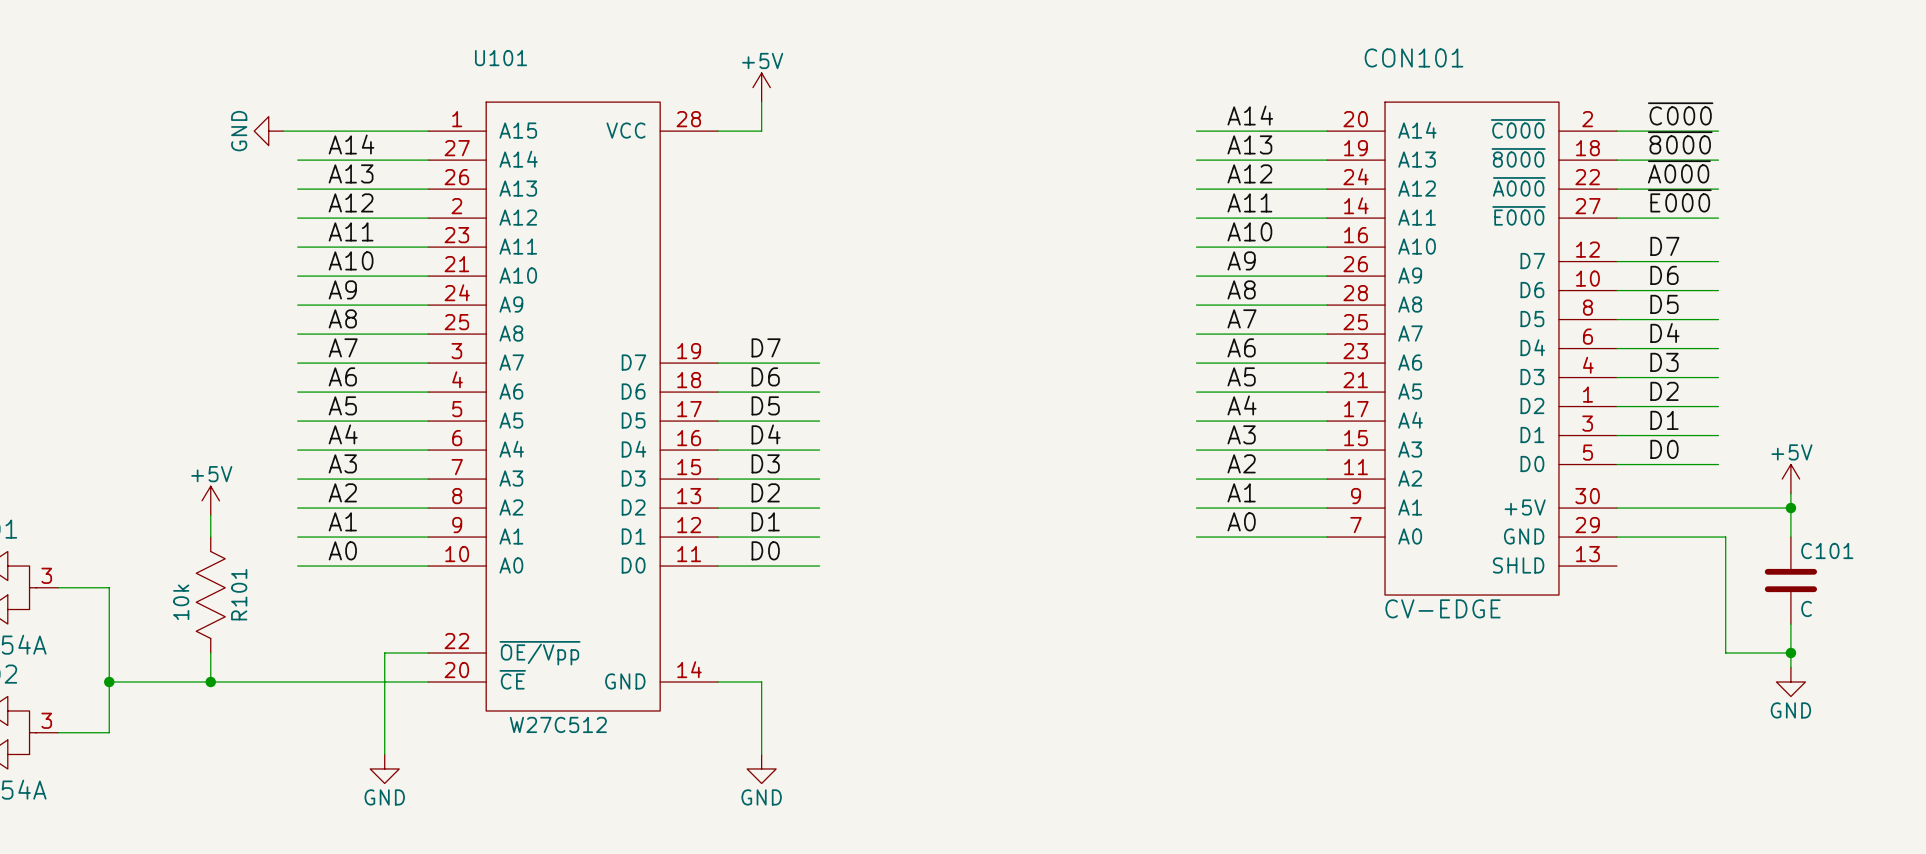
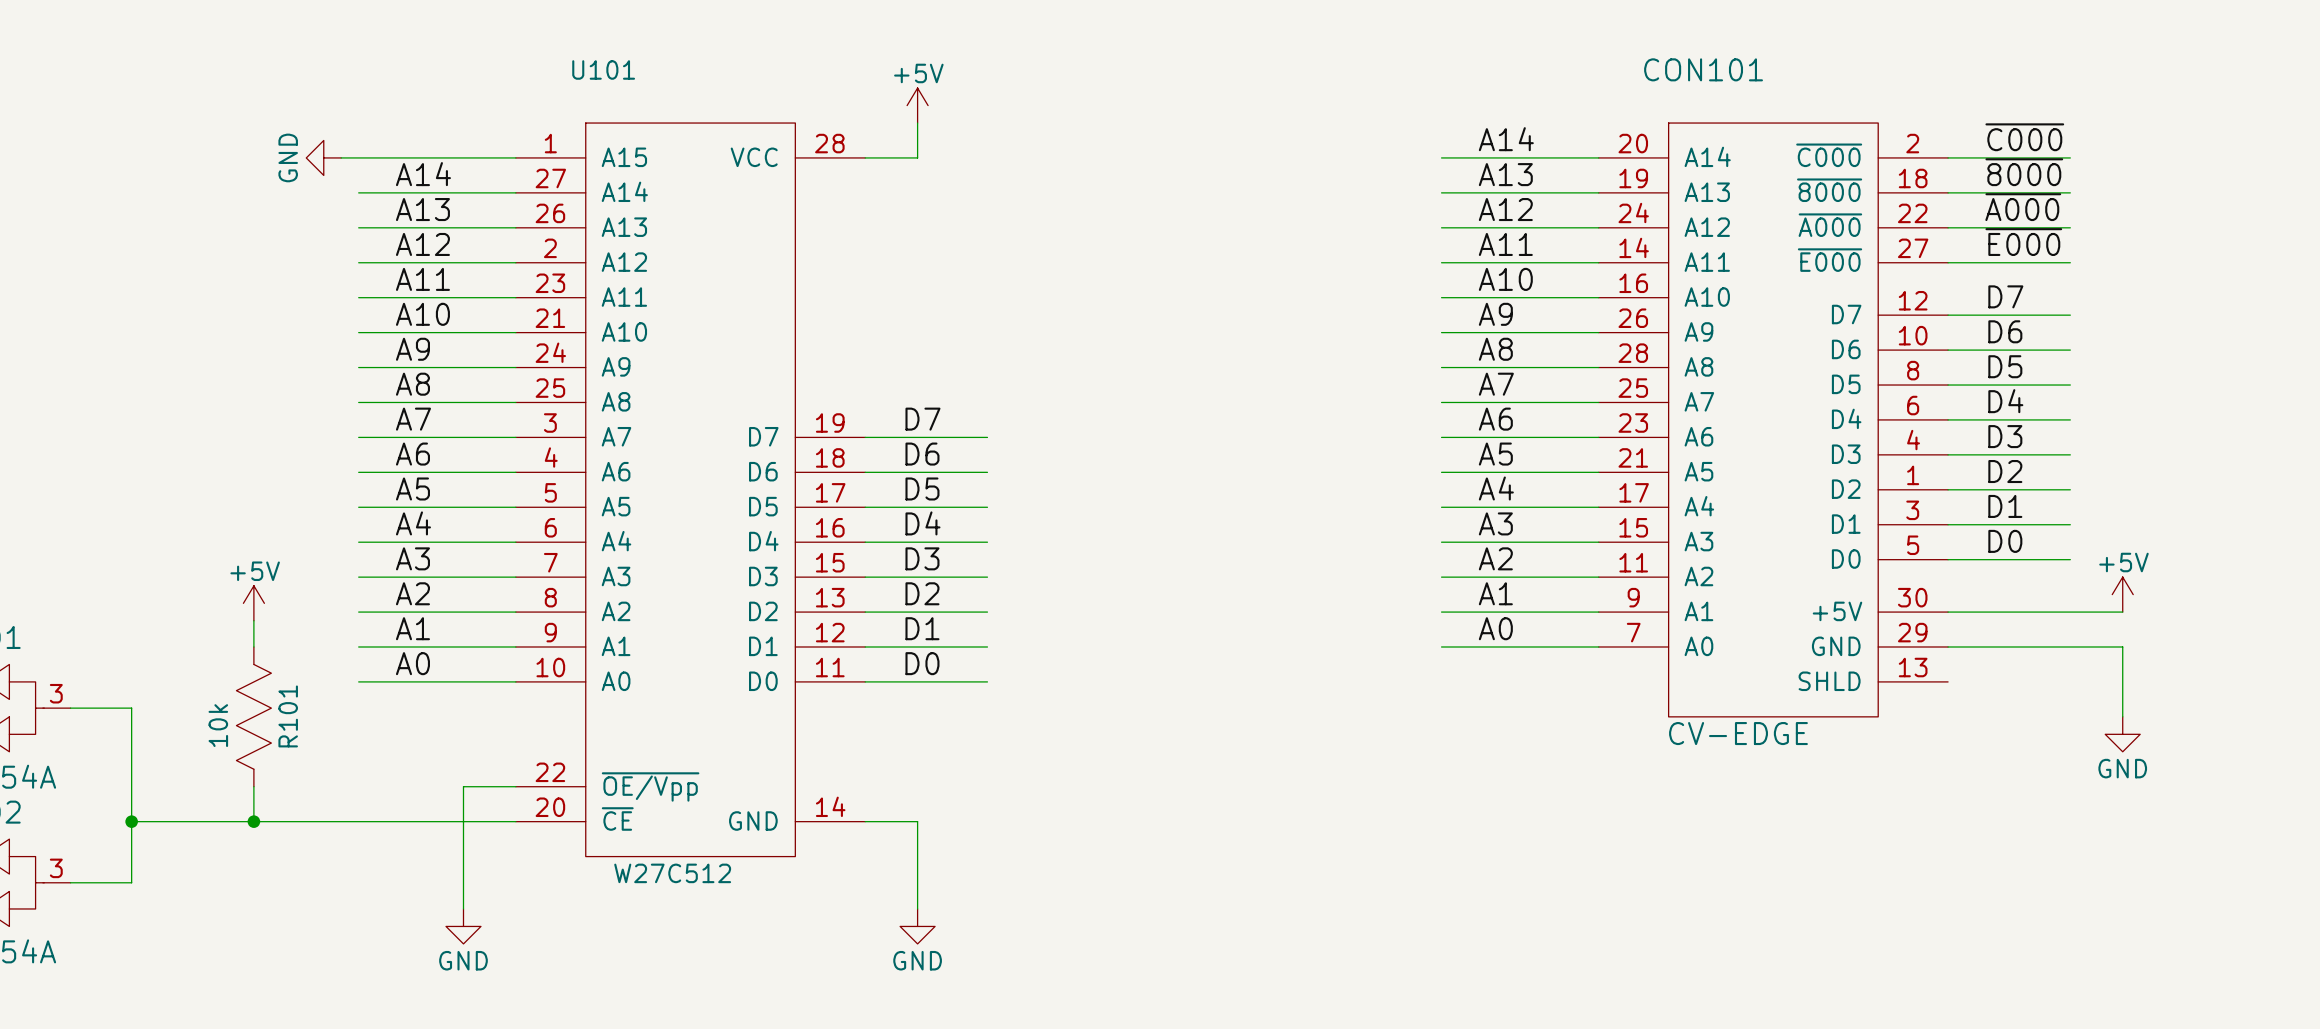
power symbol position: +5V (1790, 479) -> +5V (2122, 594)
wire: (1790, 493) (1790, 537) -> none
wire: (1761, 508) (1790, 508) -> none
junction: (1790, 508) -> none
wire: (1725, 537) (1725, 653) (1790, 653) -> (2079, 646) (2122, 646) (2122, 716)
C101: C (1790, 580) -> none
wire: (1790, 624) (1790, 667) -> none
junction: (1790, 653) -> none
power symbol position: GND (1790, 682) -> GND (2122, 734)

